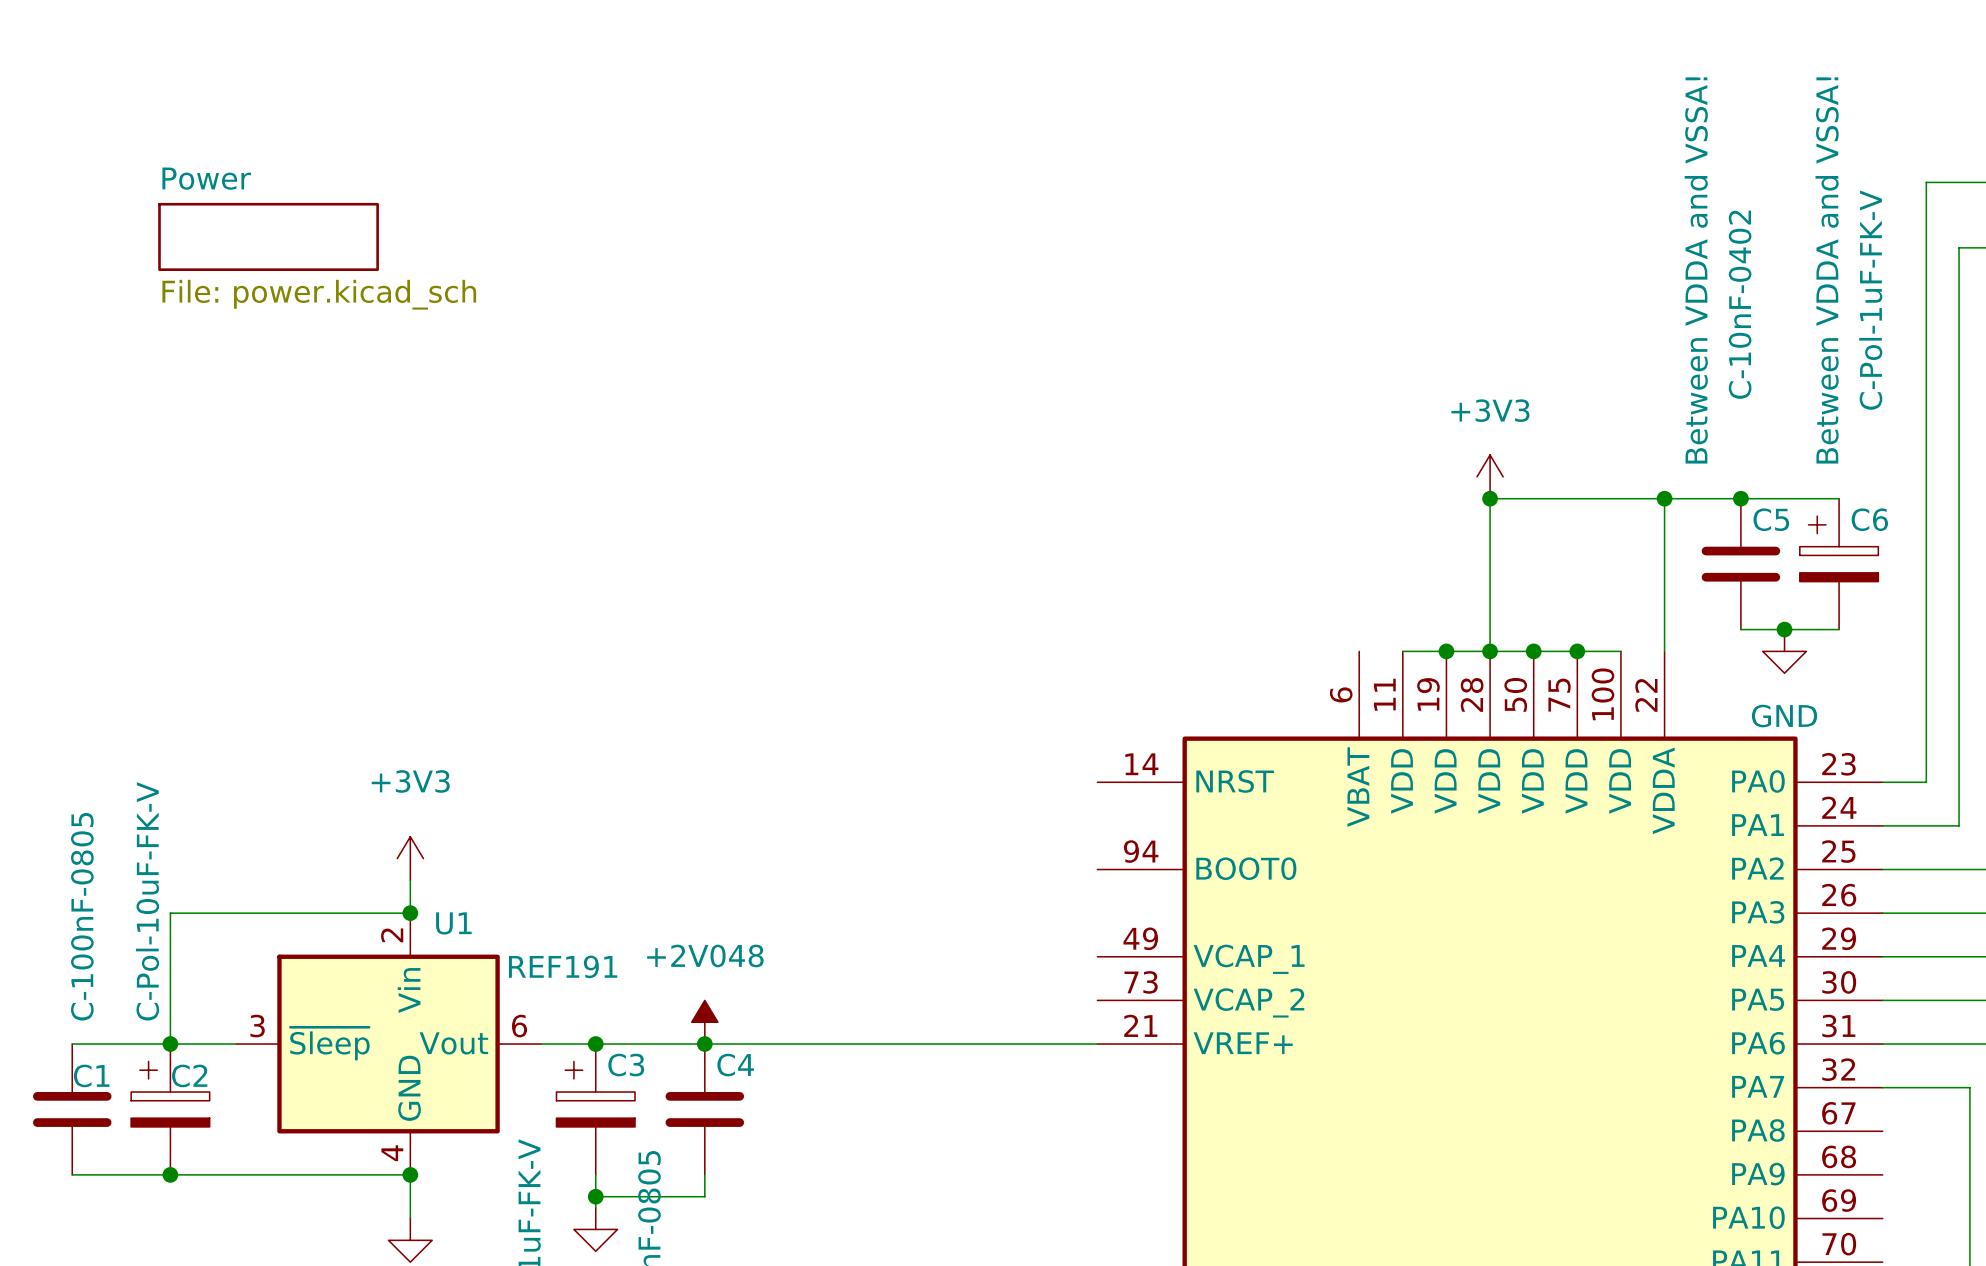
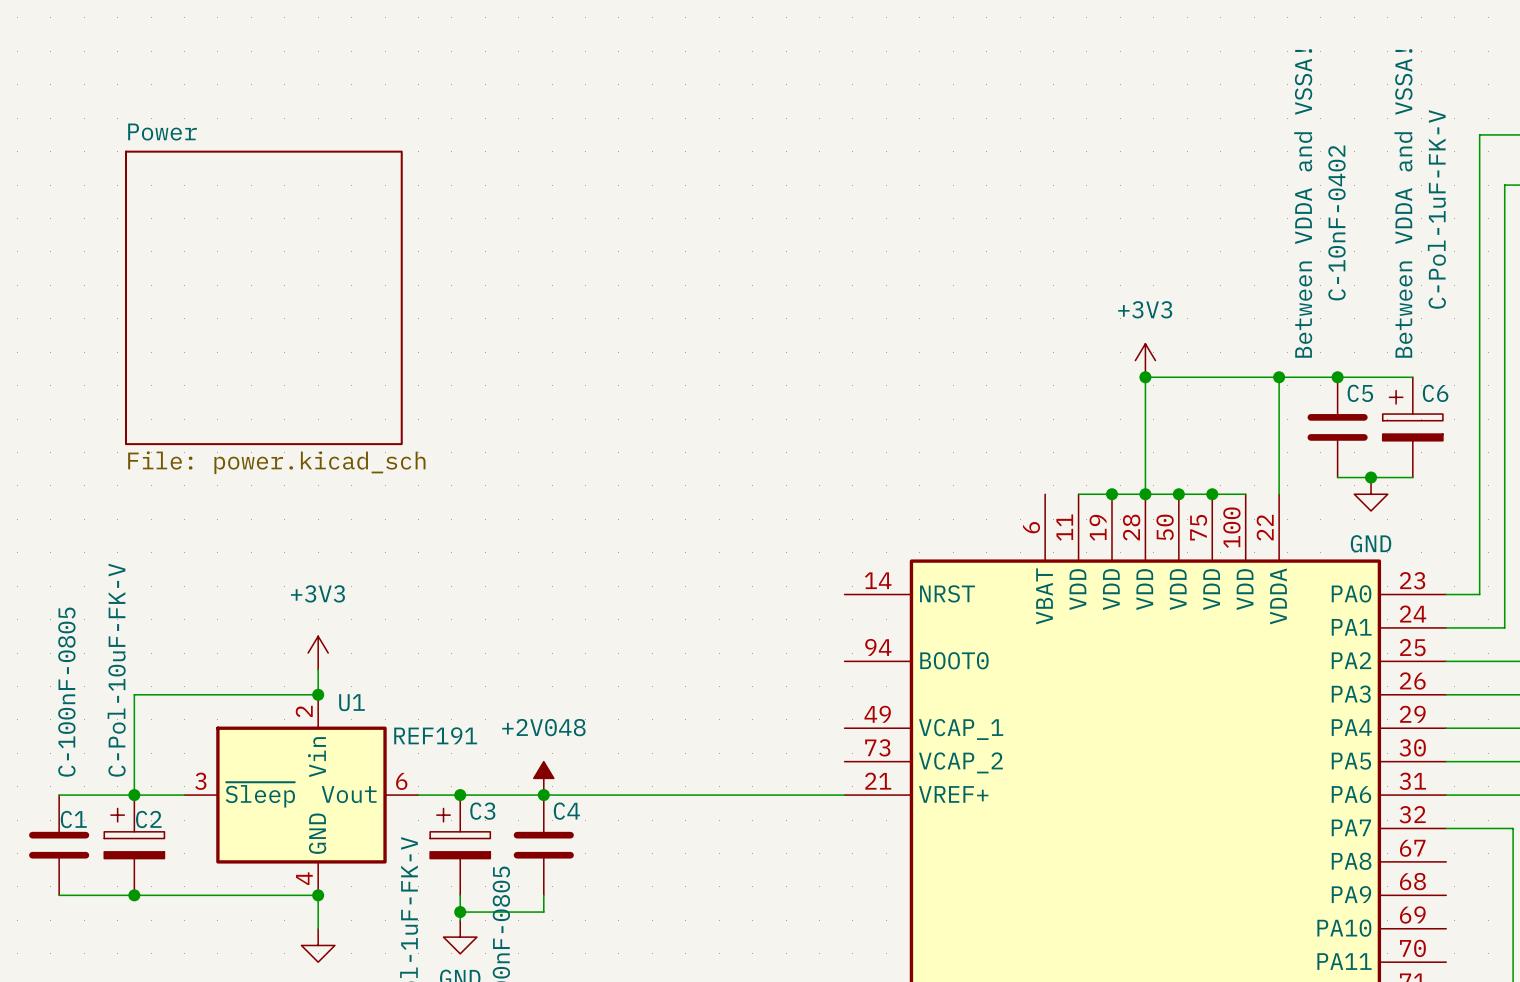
sheet Power: File: power.kicad_sch (268, 236) -> none
sheet Power: none -> File: power.kicad_sch (263, 297)

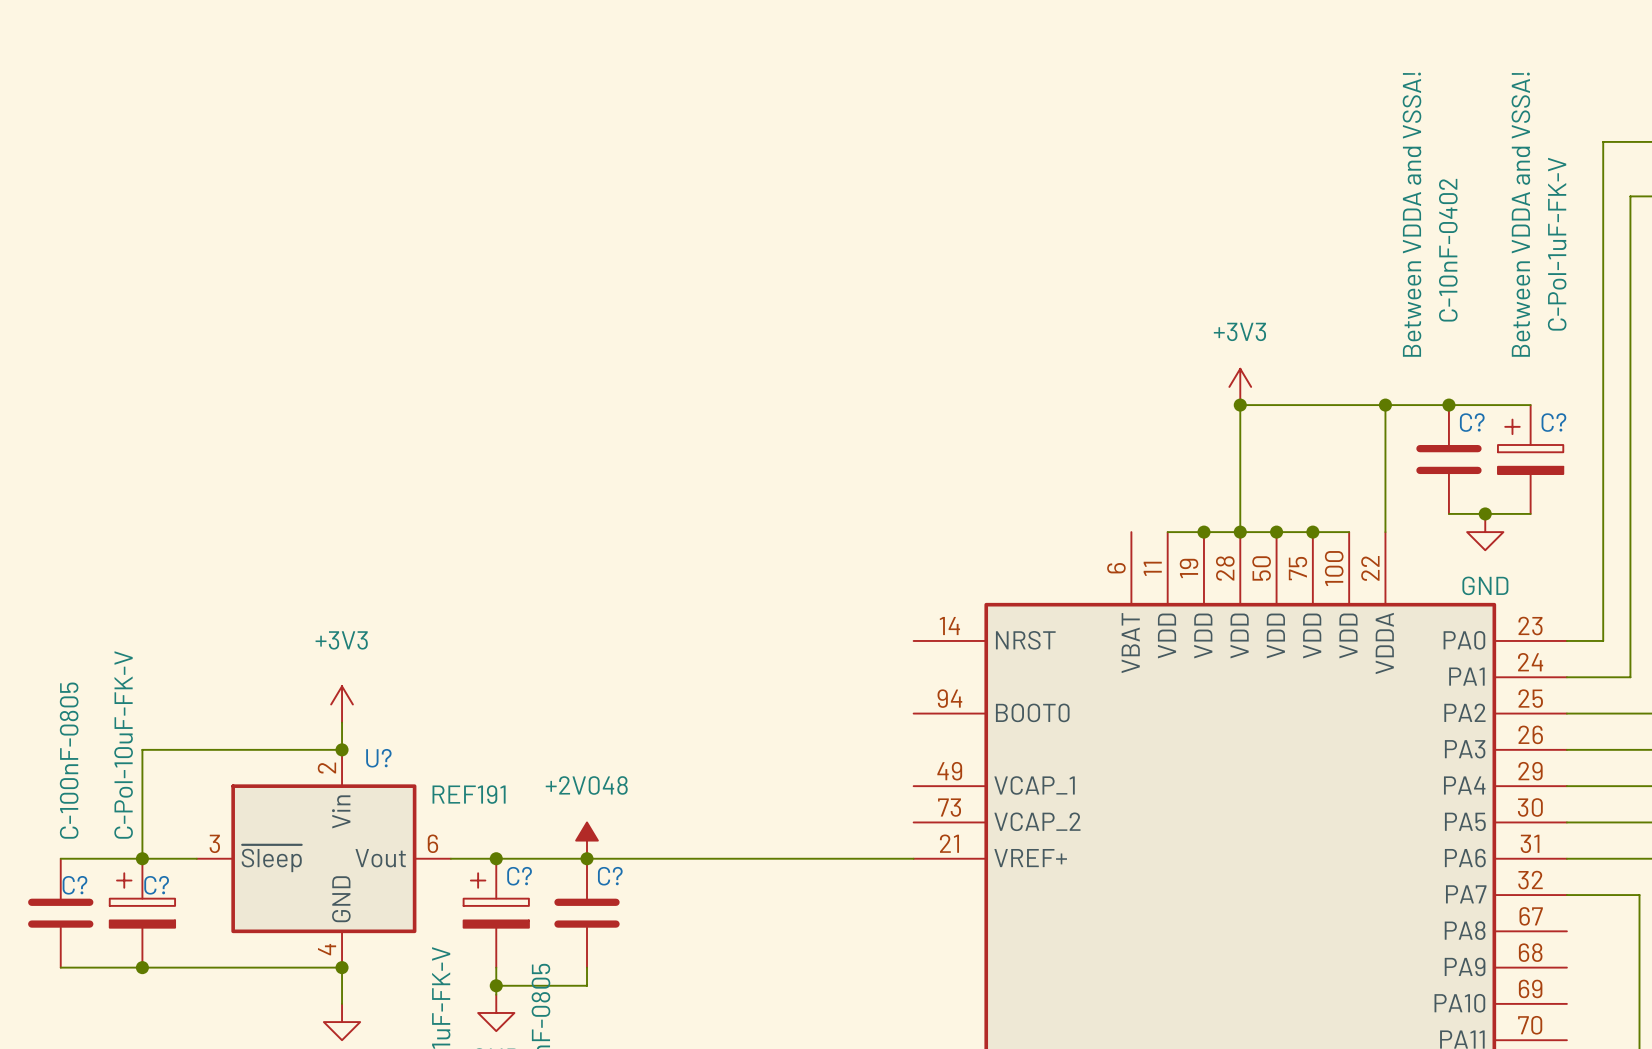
sheet Power: File: power.kicad_sch (263, 297) -> none
C5 name: C5 (1360, 393) -> C? (1472, 422)
C6 name: C6 (1435, 393) -> C? (1553, 422)
U1 name: U1 (352, 702) -> U? (378, 758)
C3 name: C3 (482, 811) -> C? (519, 876)
C4 name: C4 (566, 811) -> C? (610, 876)
C1 name: C1 (73, 819) -> C? (74, 885)
C2 name: C2 (148, 819) -> C? (156, 885)

